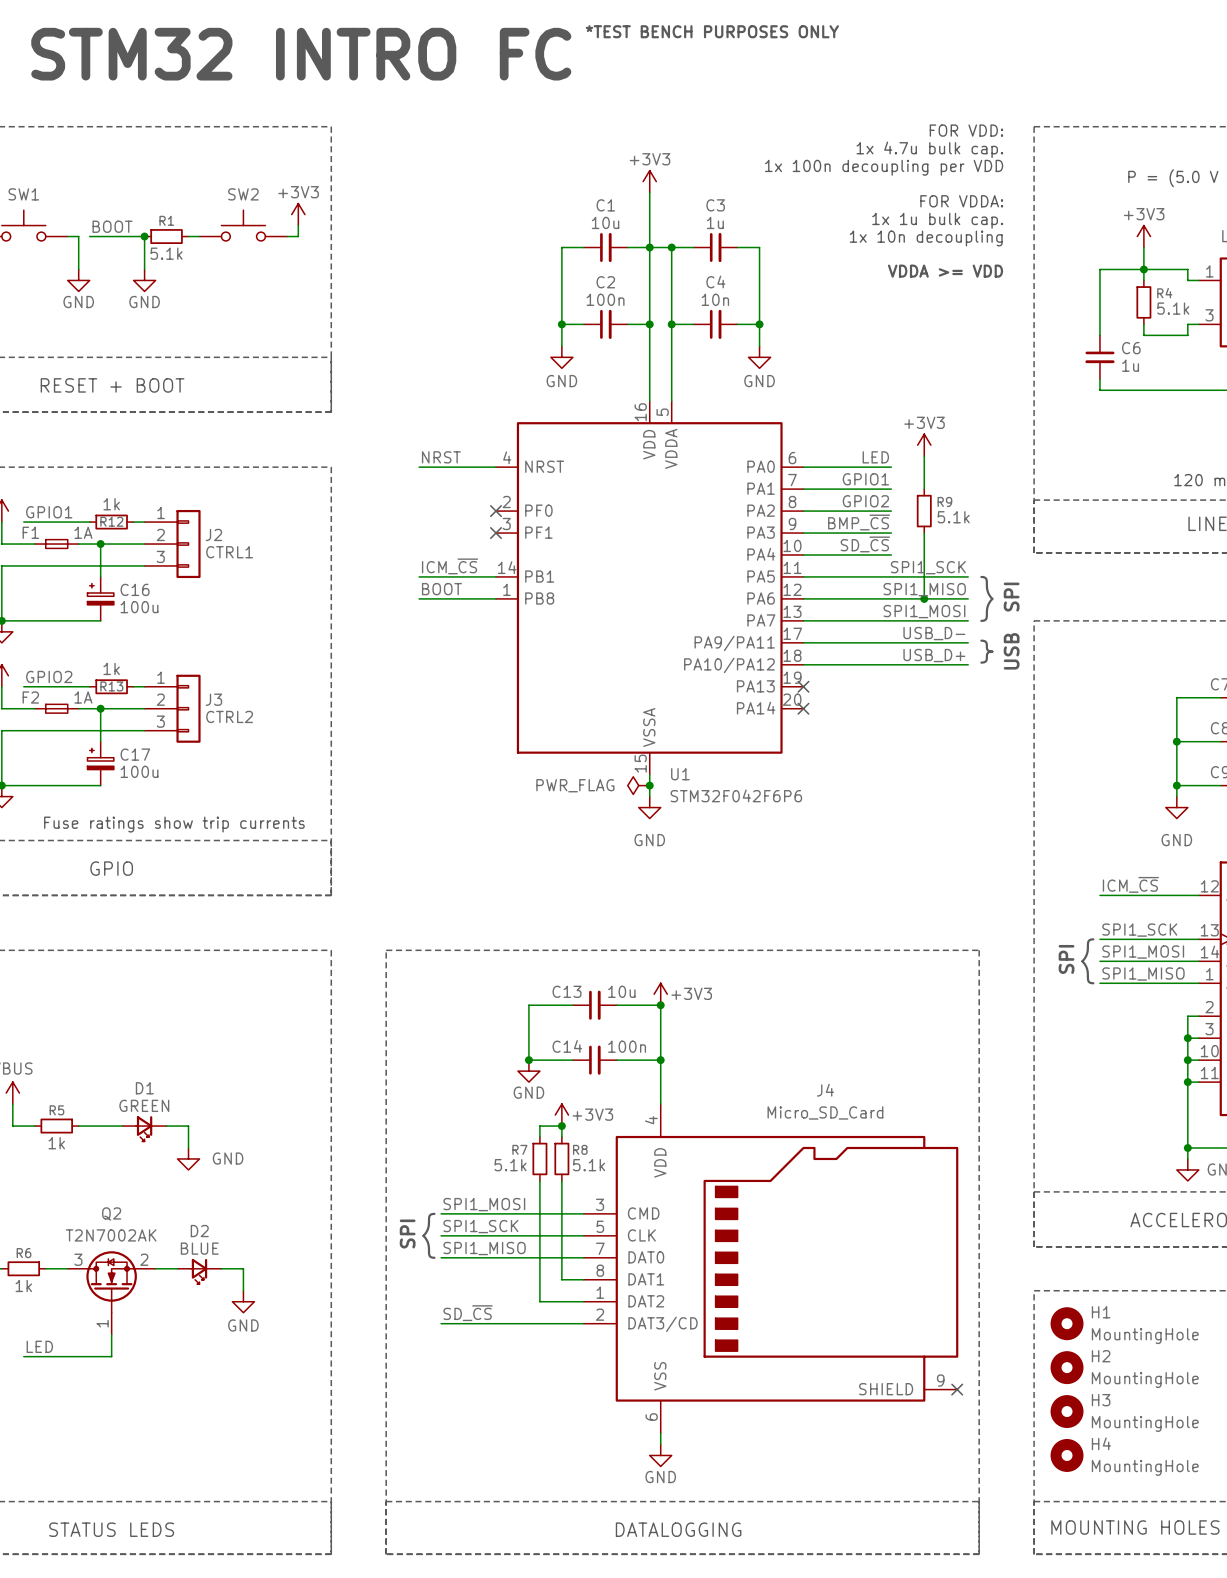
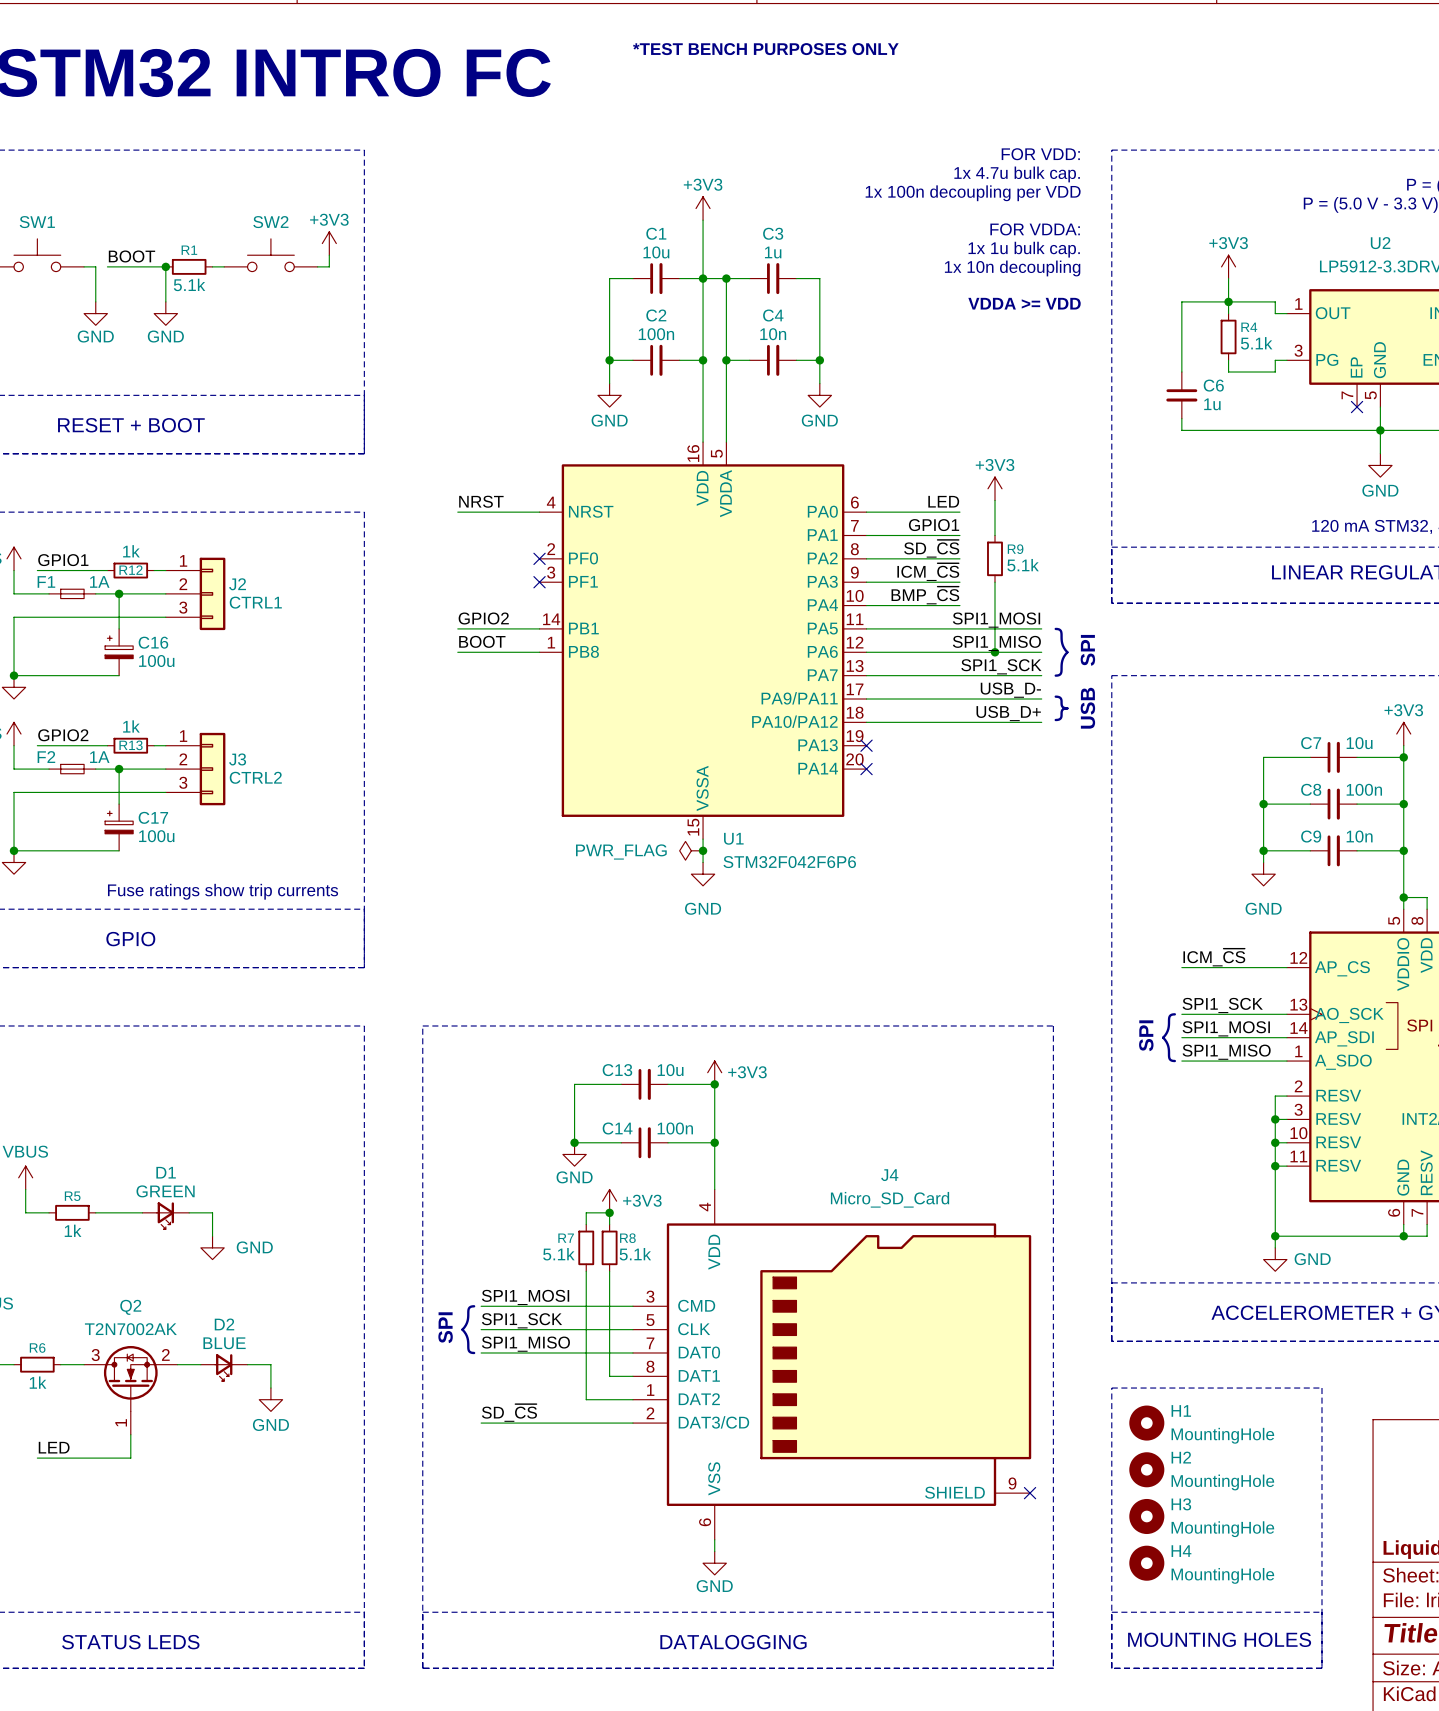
label: GPIO2 (865, 501) -> SD_~{CS} (931, 548)
label: BMP_~{CS} (859, 522) -> ICM_~{CS} (928, 572)
label: SD_~{CS} (865, 544) -> BMP_~{CS} (925, 595)
label: ICM_~{CS} (450, 566) -> GPIO2 (483, 618)
label: SPI1_SCK (928, 567) -> SPI1_MOSI (996, 620)
label: SPI1_MOSI (924, 611) -> SPI1_SCK (1001, 666)

